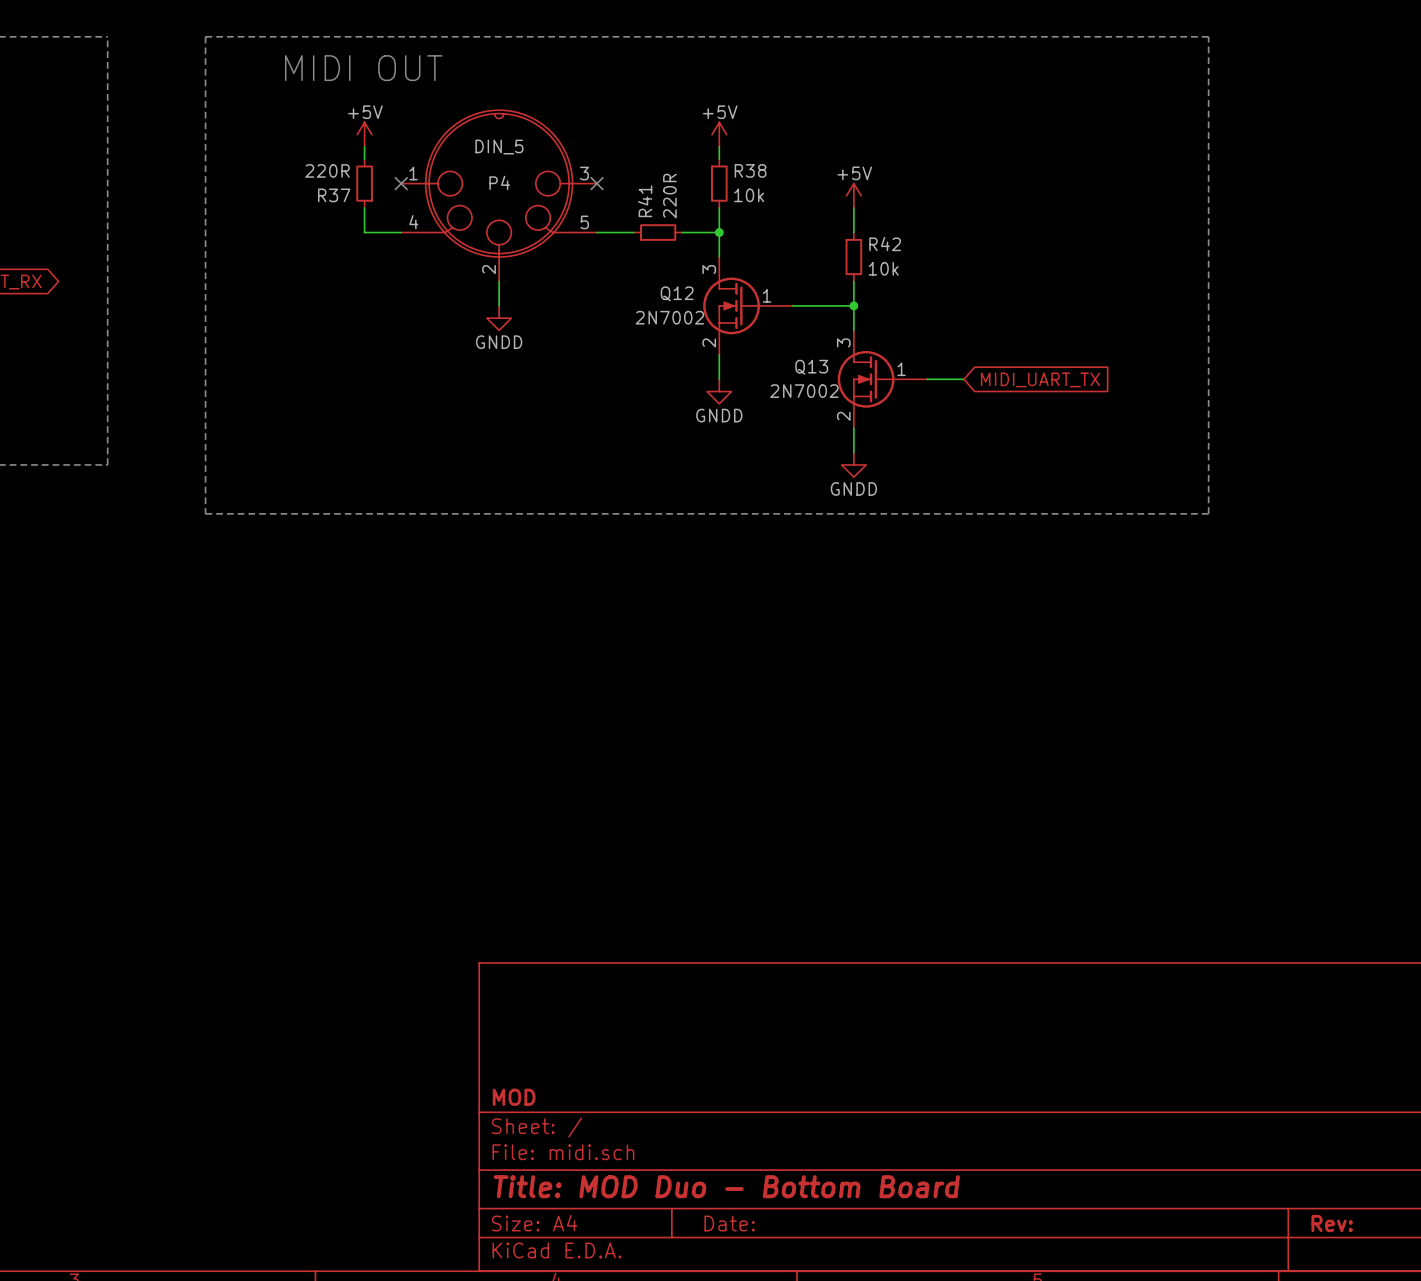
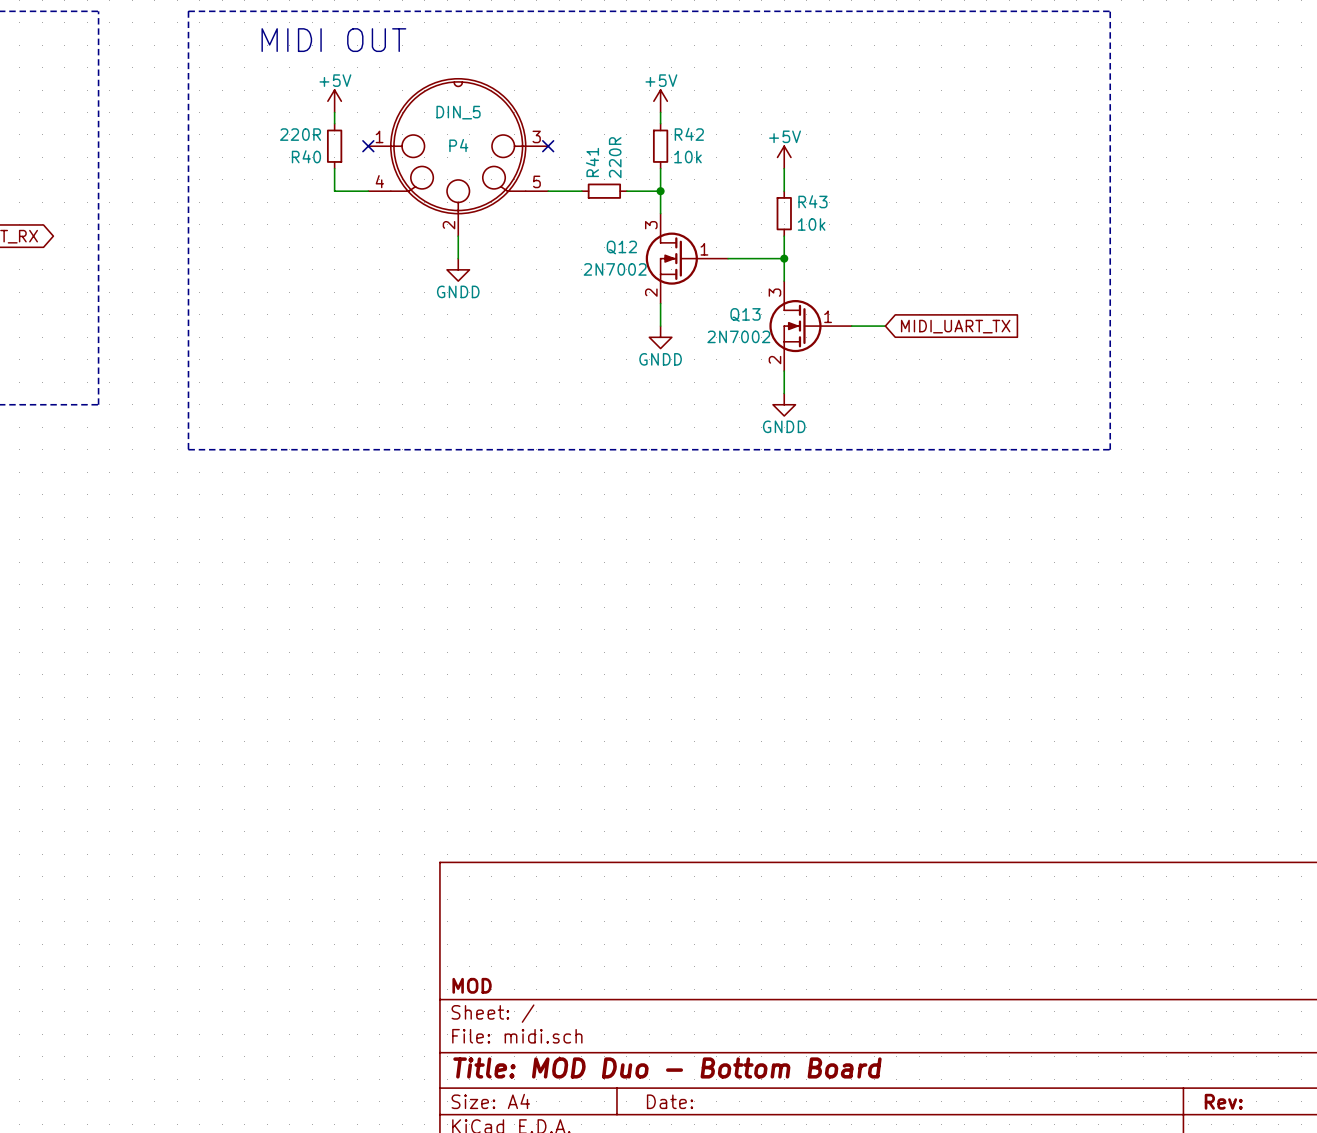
R38 name: R38 (750, 170) -> R42 (689, 134)
R37 name: R37 (334, 195) -> R40 (306, 156)
R42 name: R42 (885, 244) -> R43 (812, 201)

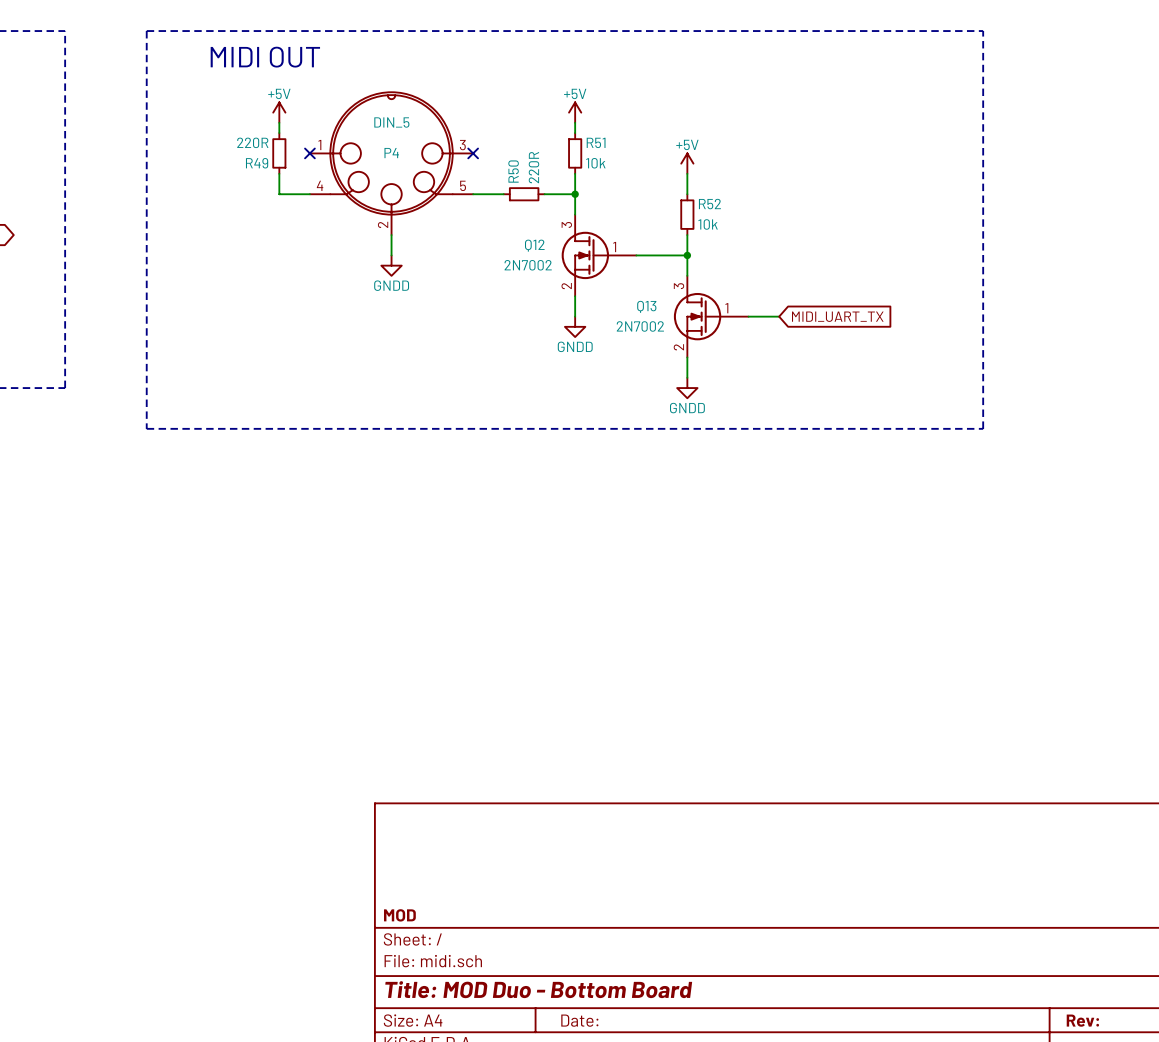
R42 name: R42 (689, 134) -> R51 (596, 142)
R40 name: R40 (306, 156) -> R49 (257, 163)
R41 name: R41 (592, 162) -> R50 (513, 171)
R43 name: R43 (812, 201) -> R52 (709, 204)

